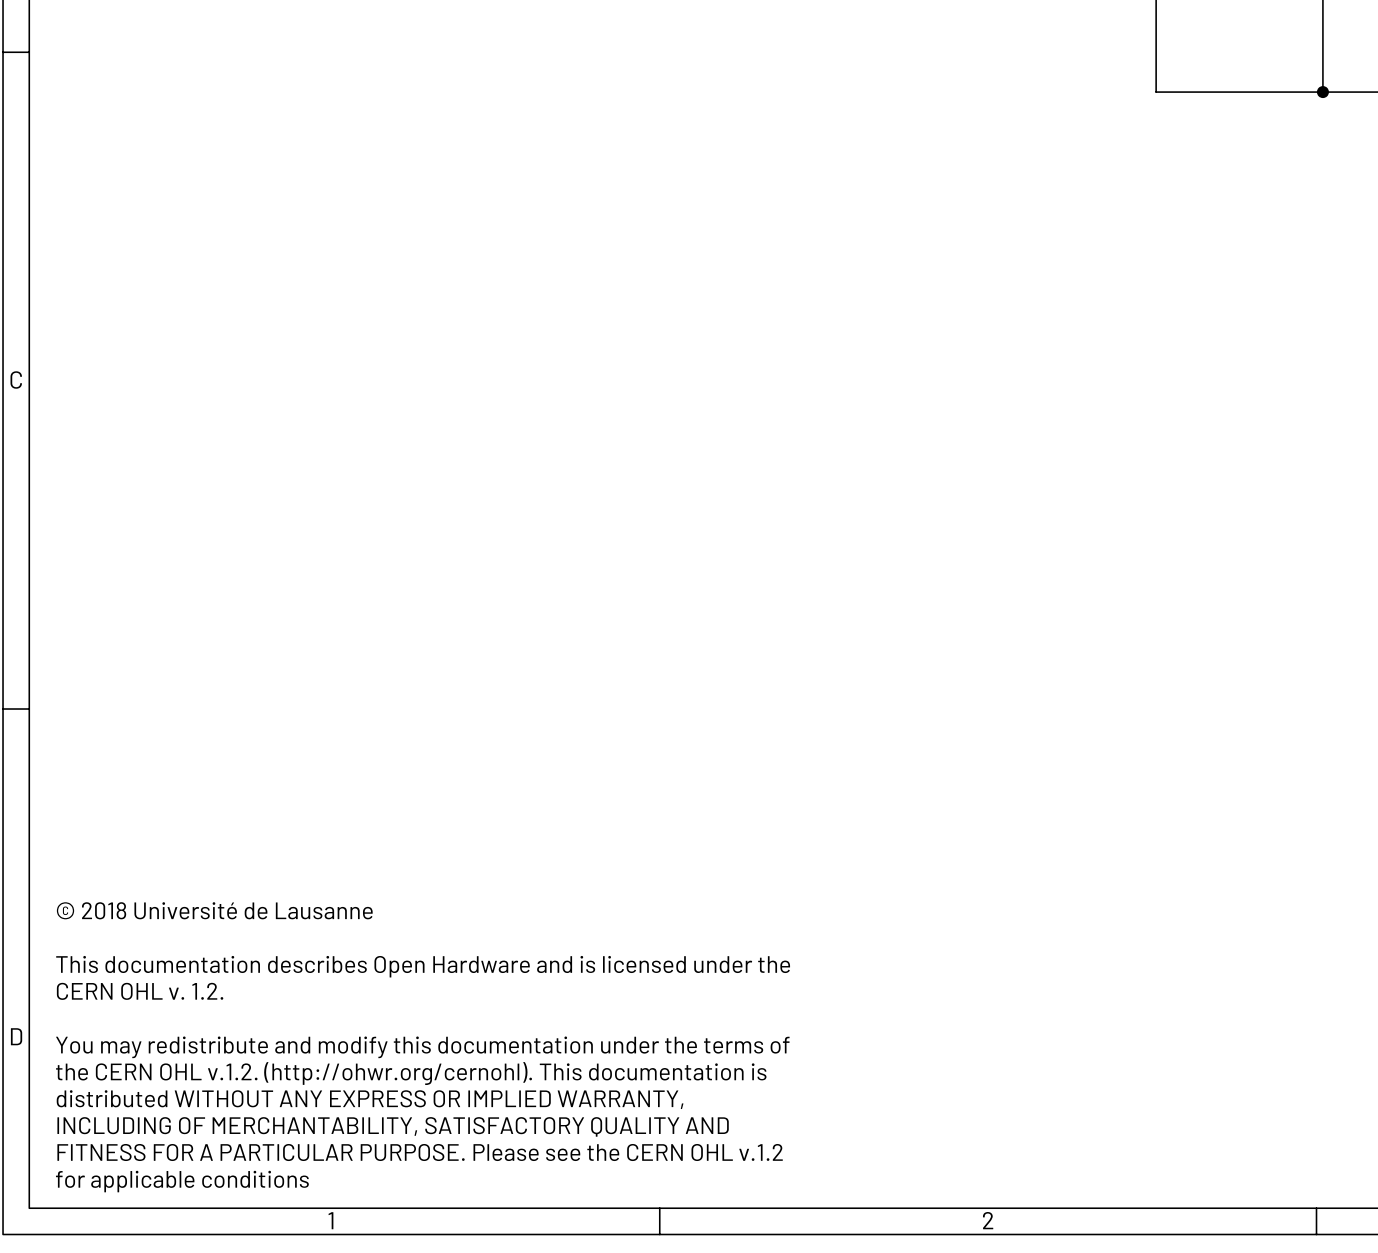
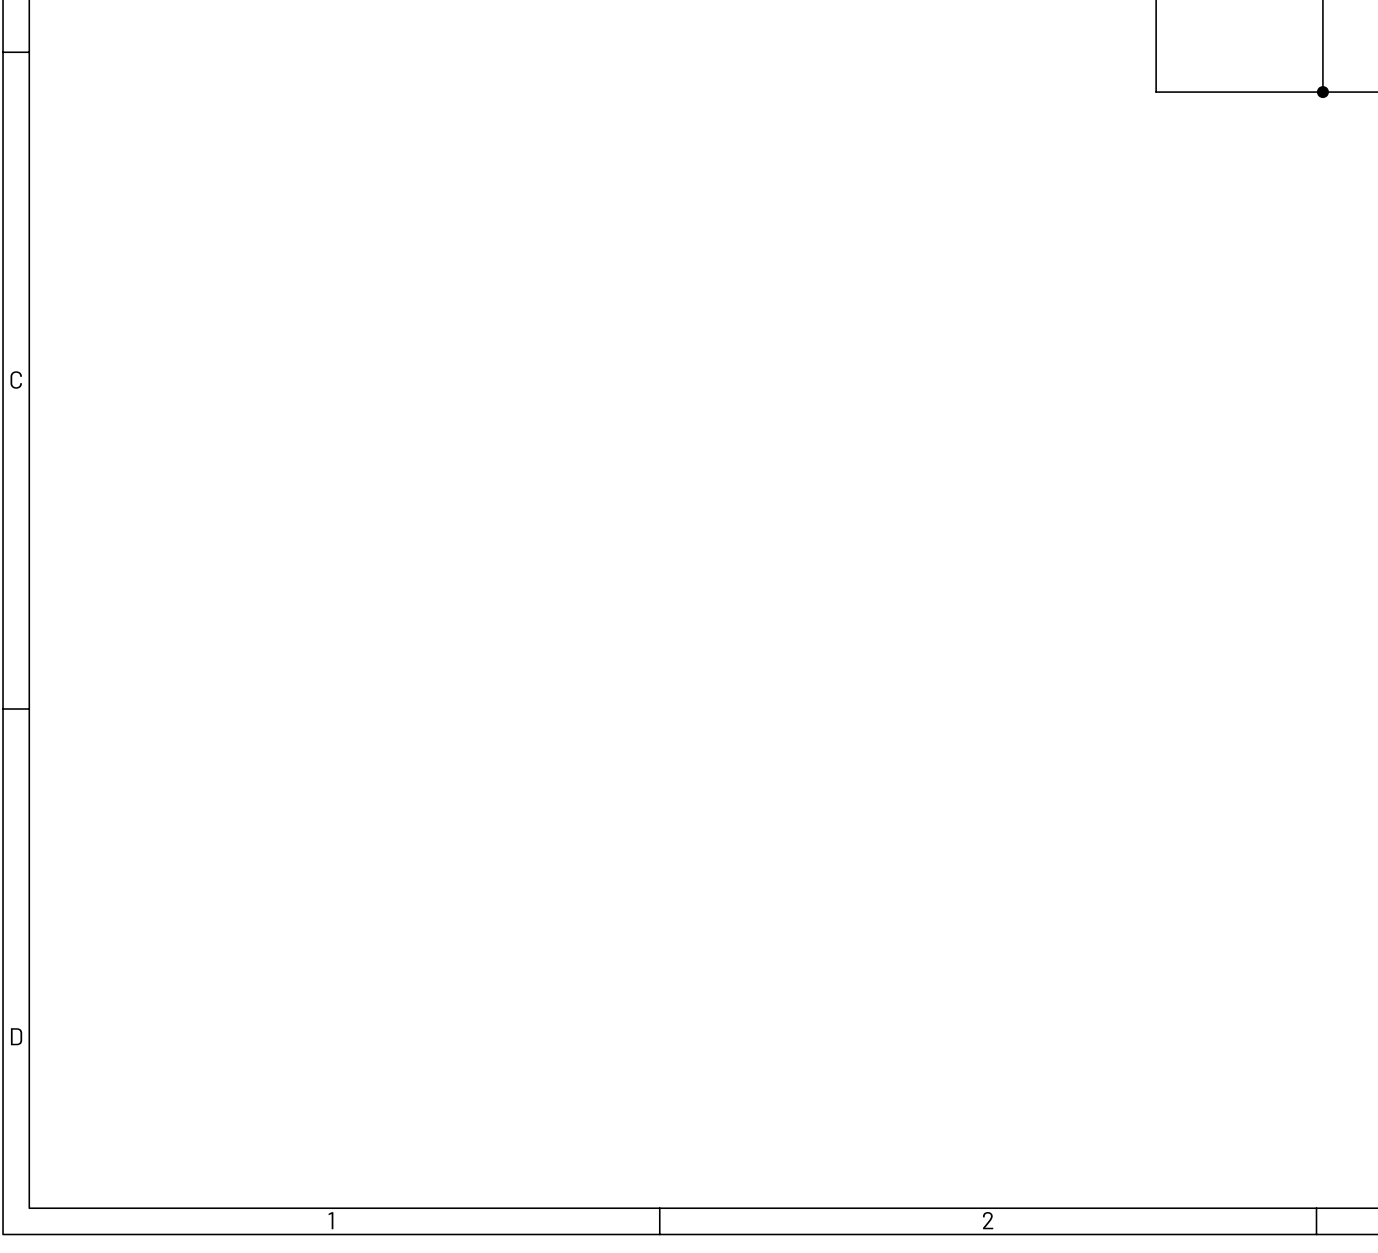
text: © 2018 Université de Lausanne (214, 910) -> none
text: This documentation describes Open Hardware and is licensed under the (423, 966) -> none
text: CERN OHL v. 1.2. (140, 991) -> none
text: You may redistribute and modify this documentation under the terms of (422, 1047) -> none
text: the CERN OHL v.1.2. (http://ohwr.org/cernohl). This documentation is (411, 1073) -> none
text: distributed WITHOUT ANY EXPRESS OR IMPLIED WARRANTY, (370, 1099) -> none
text: INCLUDING OF MERCHANTABILITY, SATISFACTORY QUALITY AND (393, 1126) -> none
text: FITNESS FOR A PARTICULAR PURPOSE. Please see the CERN OHL v.1.2 (420, 1152) -> none
text: for applicable conditions (182, 1181) -> none

